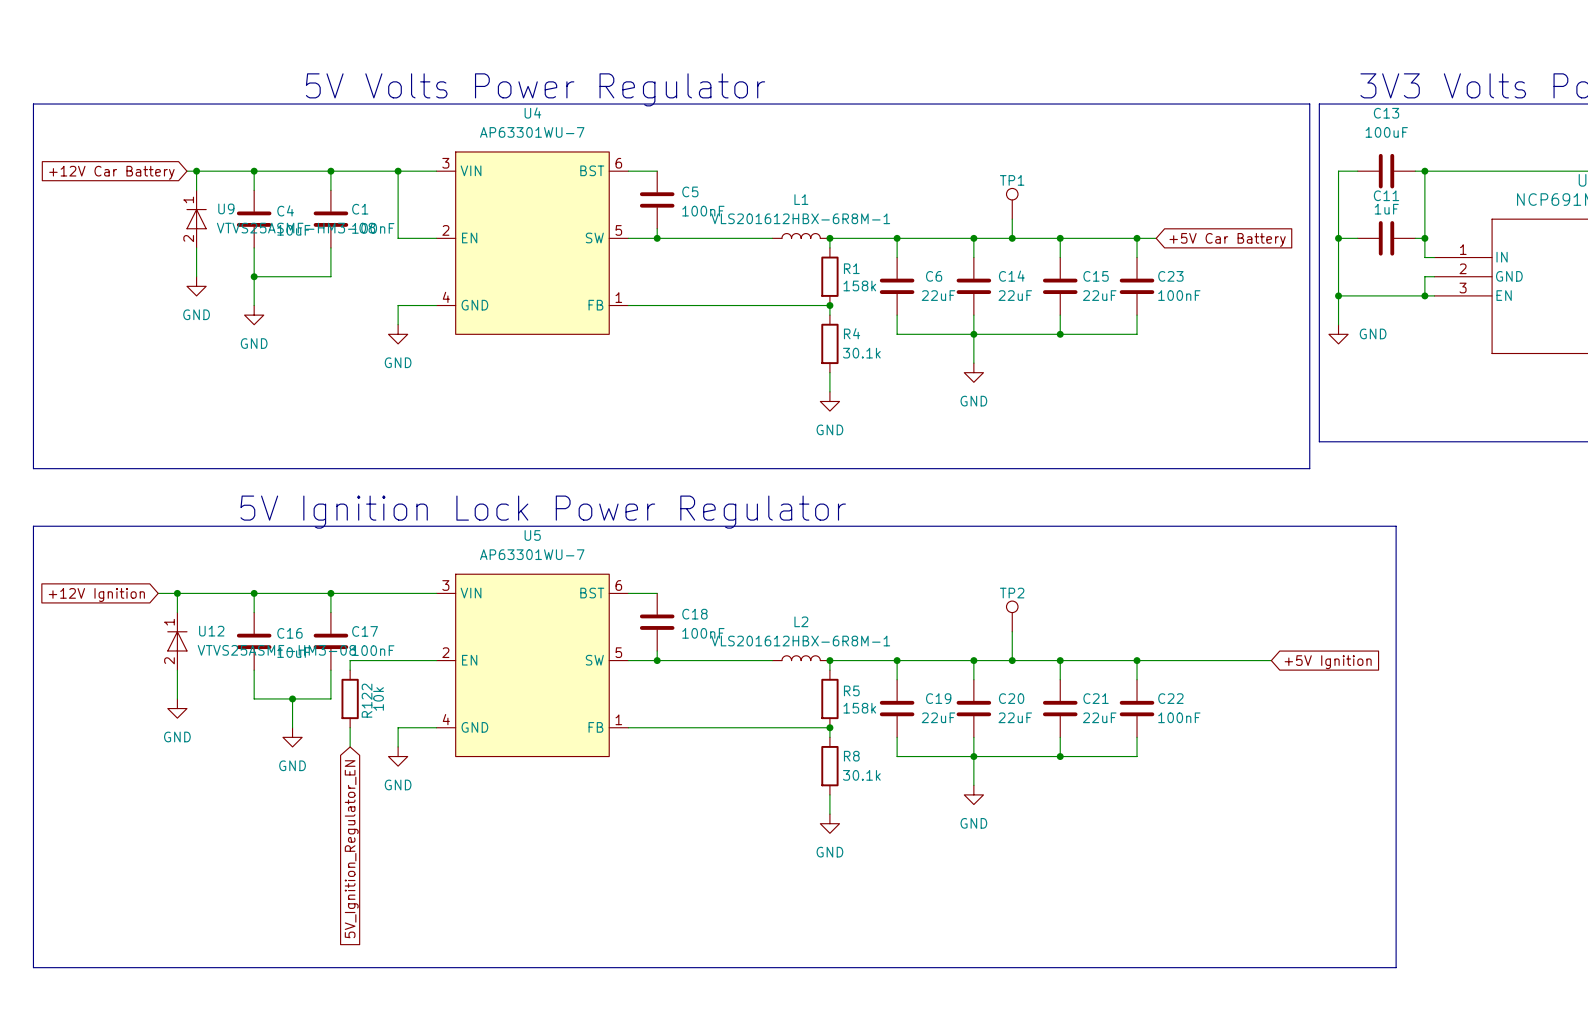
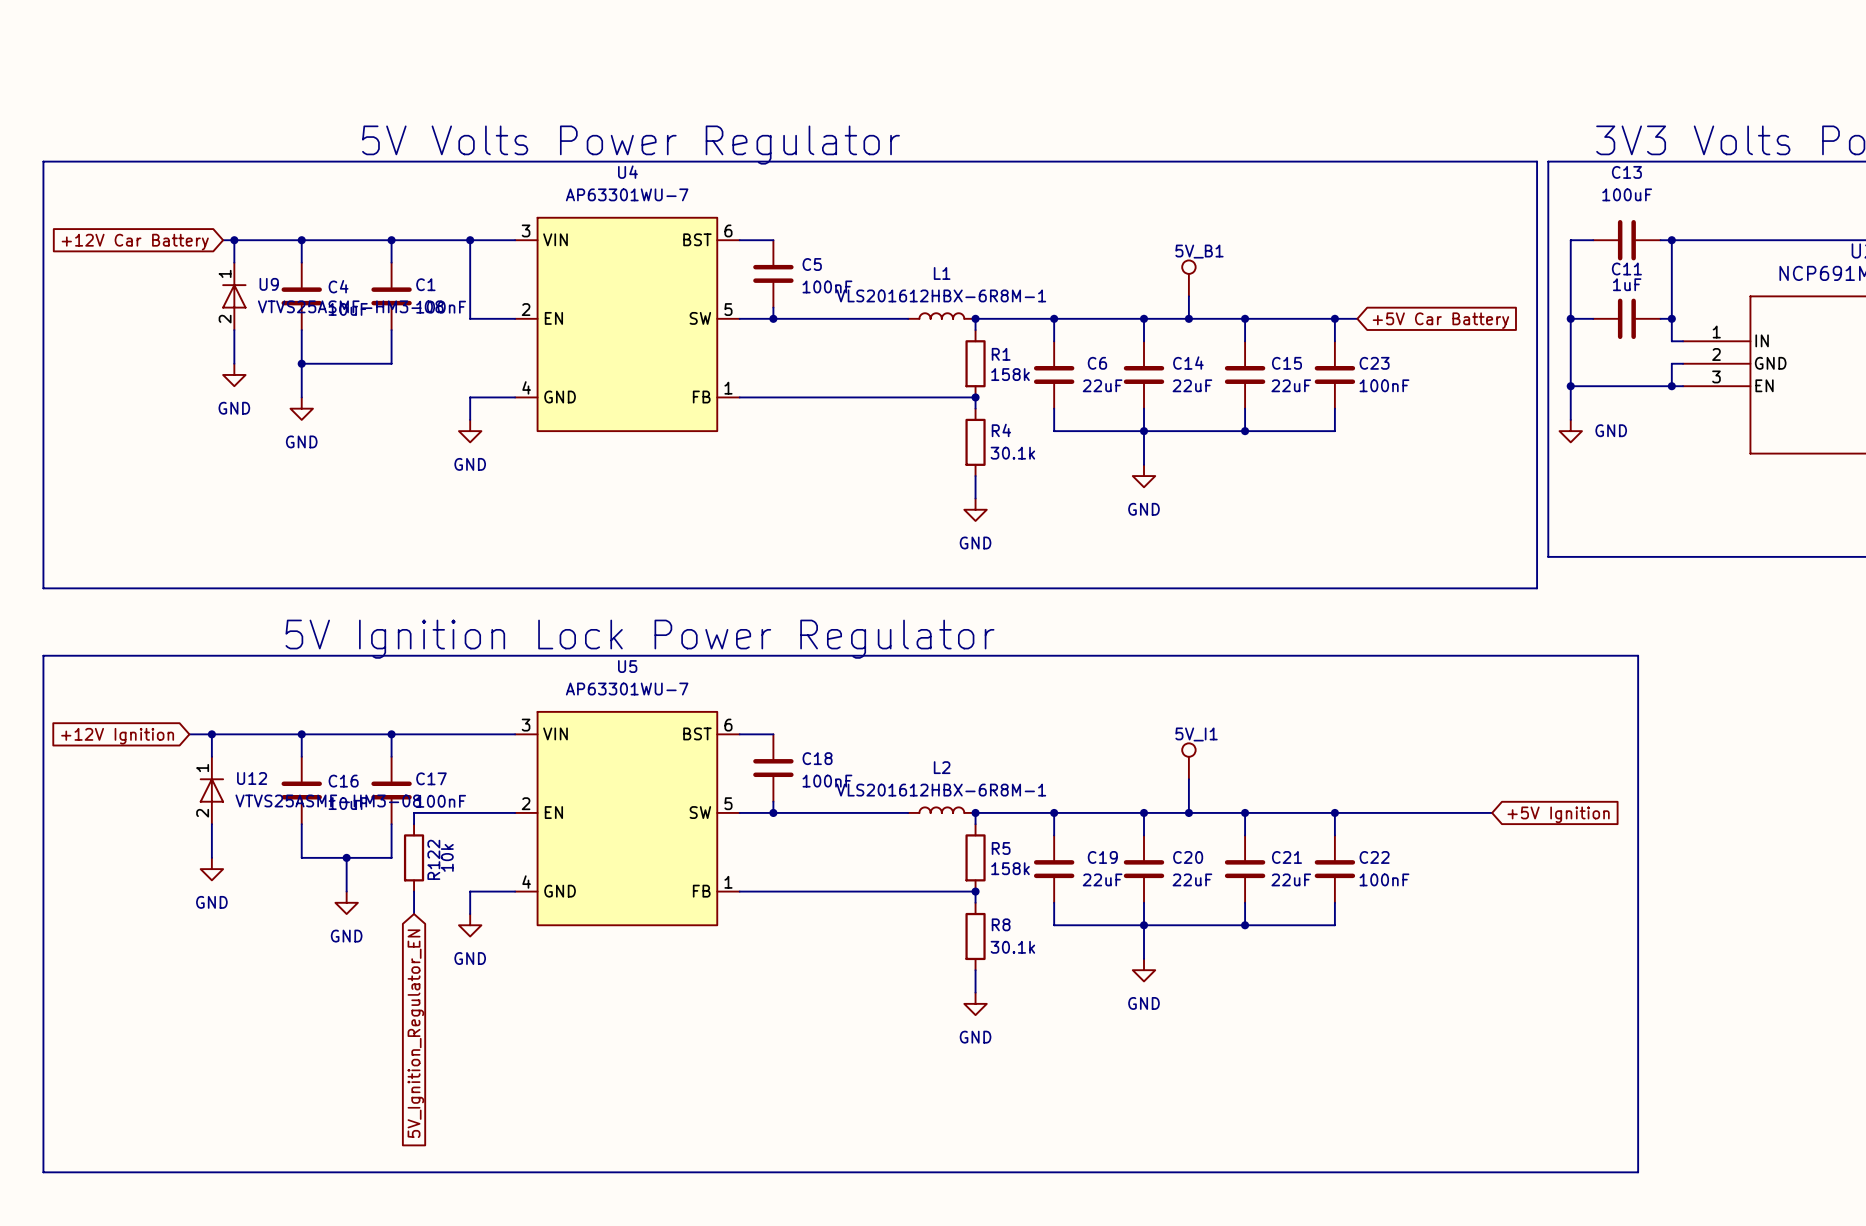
TP1 name: TP1 (1012, 180) -> 5V_B1 (1199, 251)
TP2 name: TP2 (1012, 593) -> 5V_I1 (1196, 734)

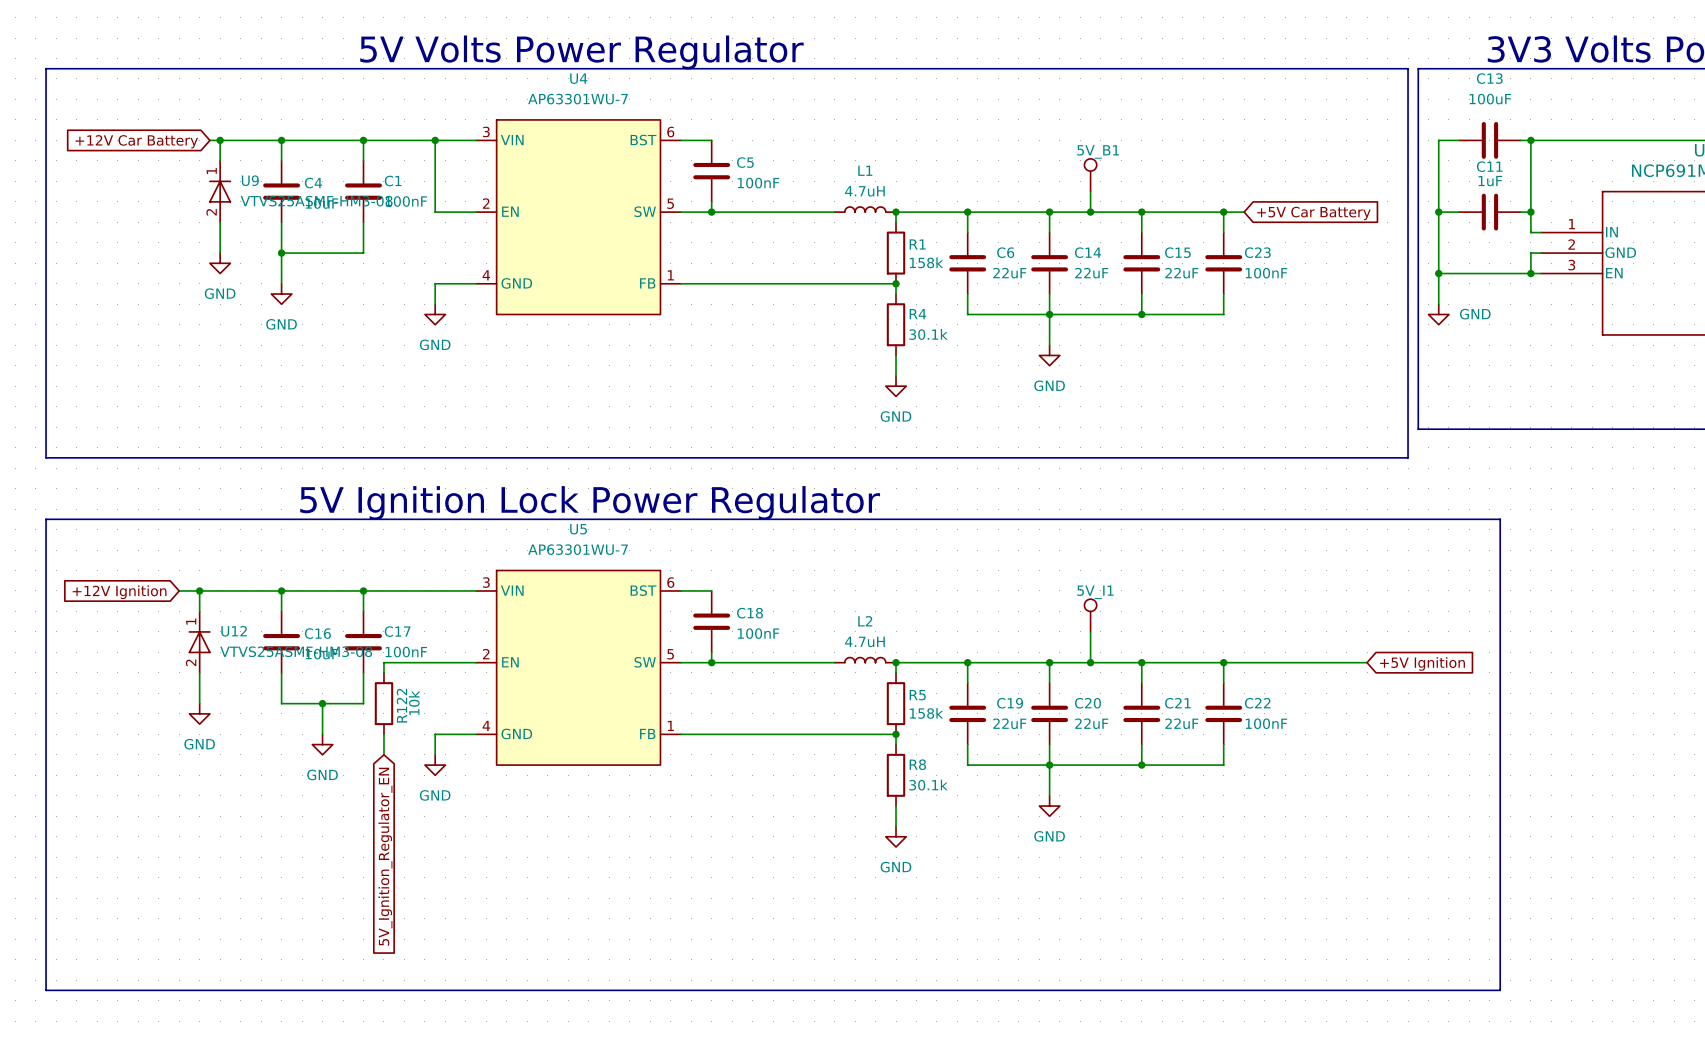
L1 value: VLS201612HBX-6R8M-1 (941, 295) -> 4.7uH (864, 191)
L2 value: VLS201612HBX-6R8M-1 (941, 790) -> 4.7uH (864, 641)

